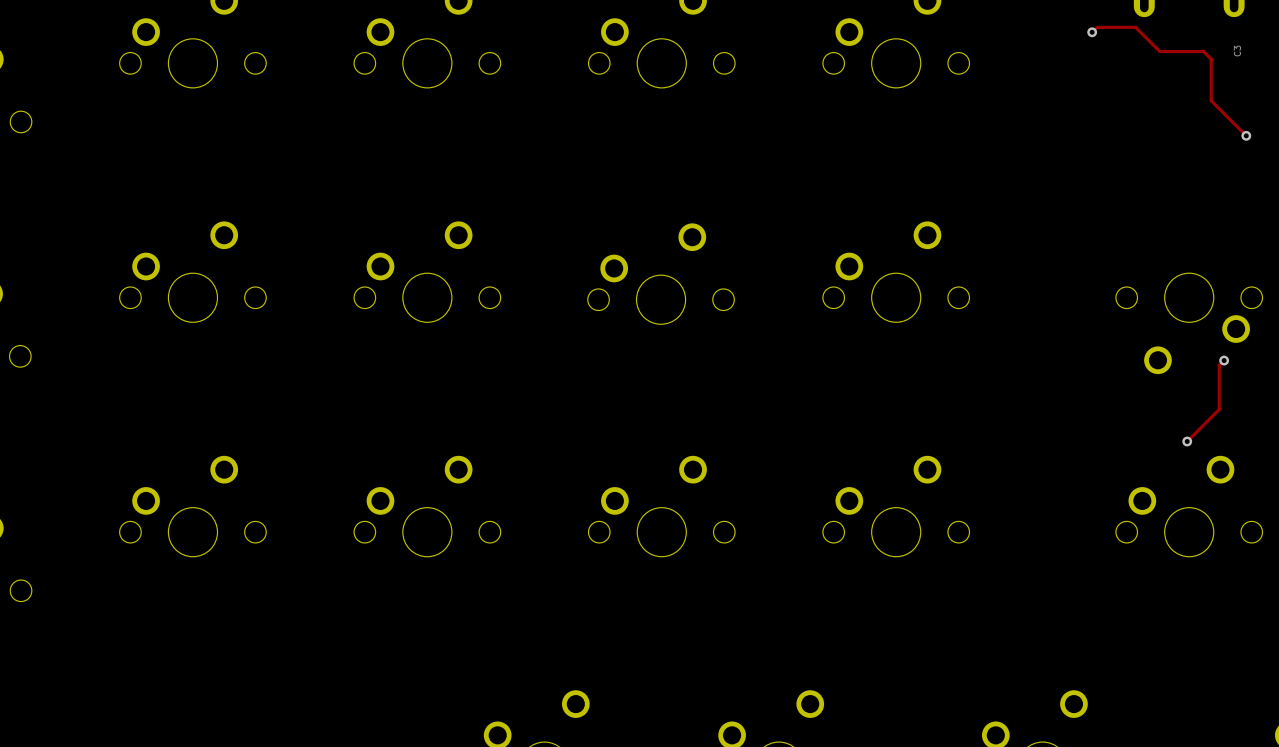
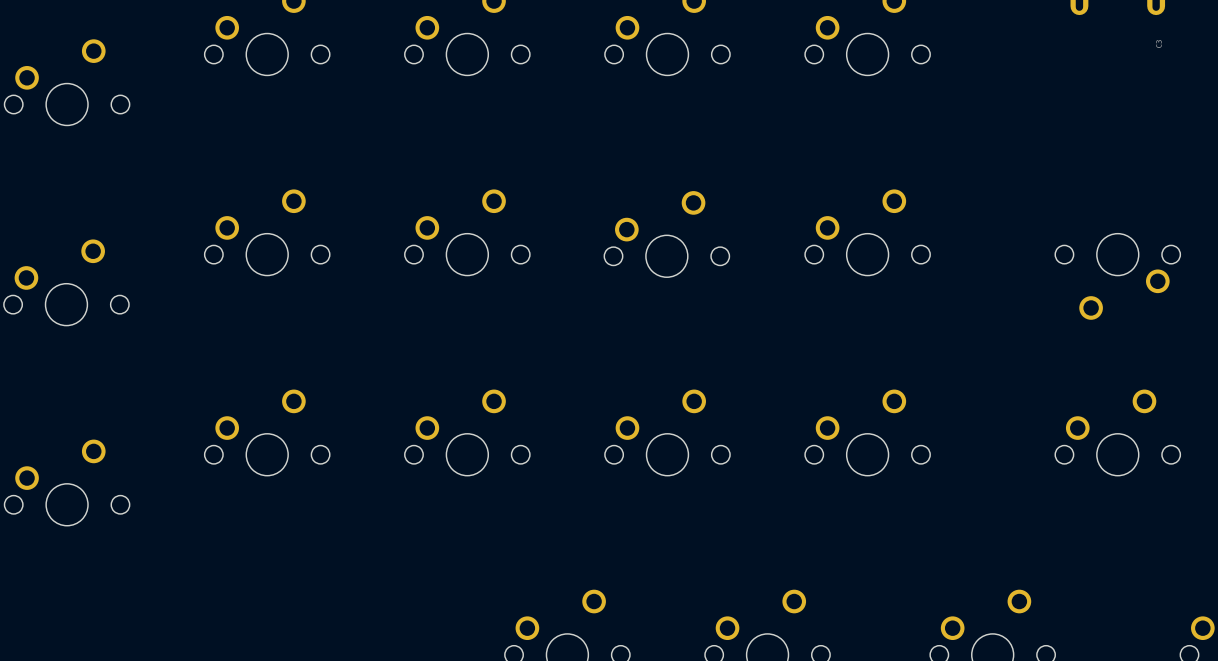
track: (1092, 32) (1097, 27) (1135, 27) (1156, 48) -> none
via: (1092, 32) -> none
track: (1156, 48) (1160, 51) (1203, 51) (1211, 59) (1211, 100) (1246, 135) -> none
via: (1246, 135) -> none
track: (1224, 360) (1219, 365) (1219, 409) (1187, 441) -> none
via: (1224, 360) -> none
via: (1187, 441) -> none

